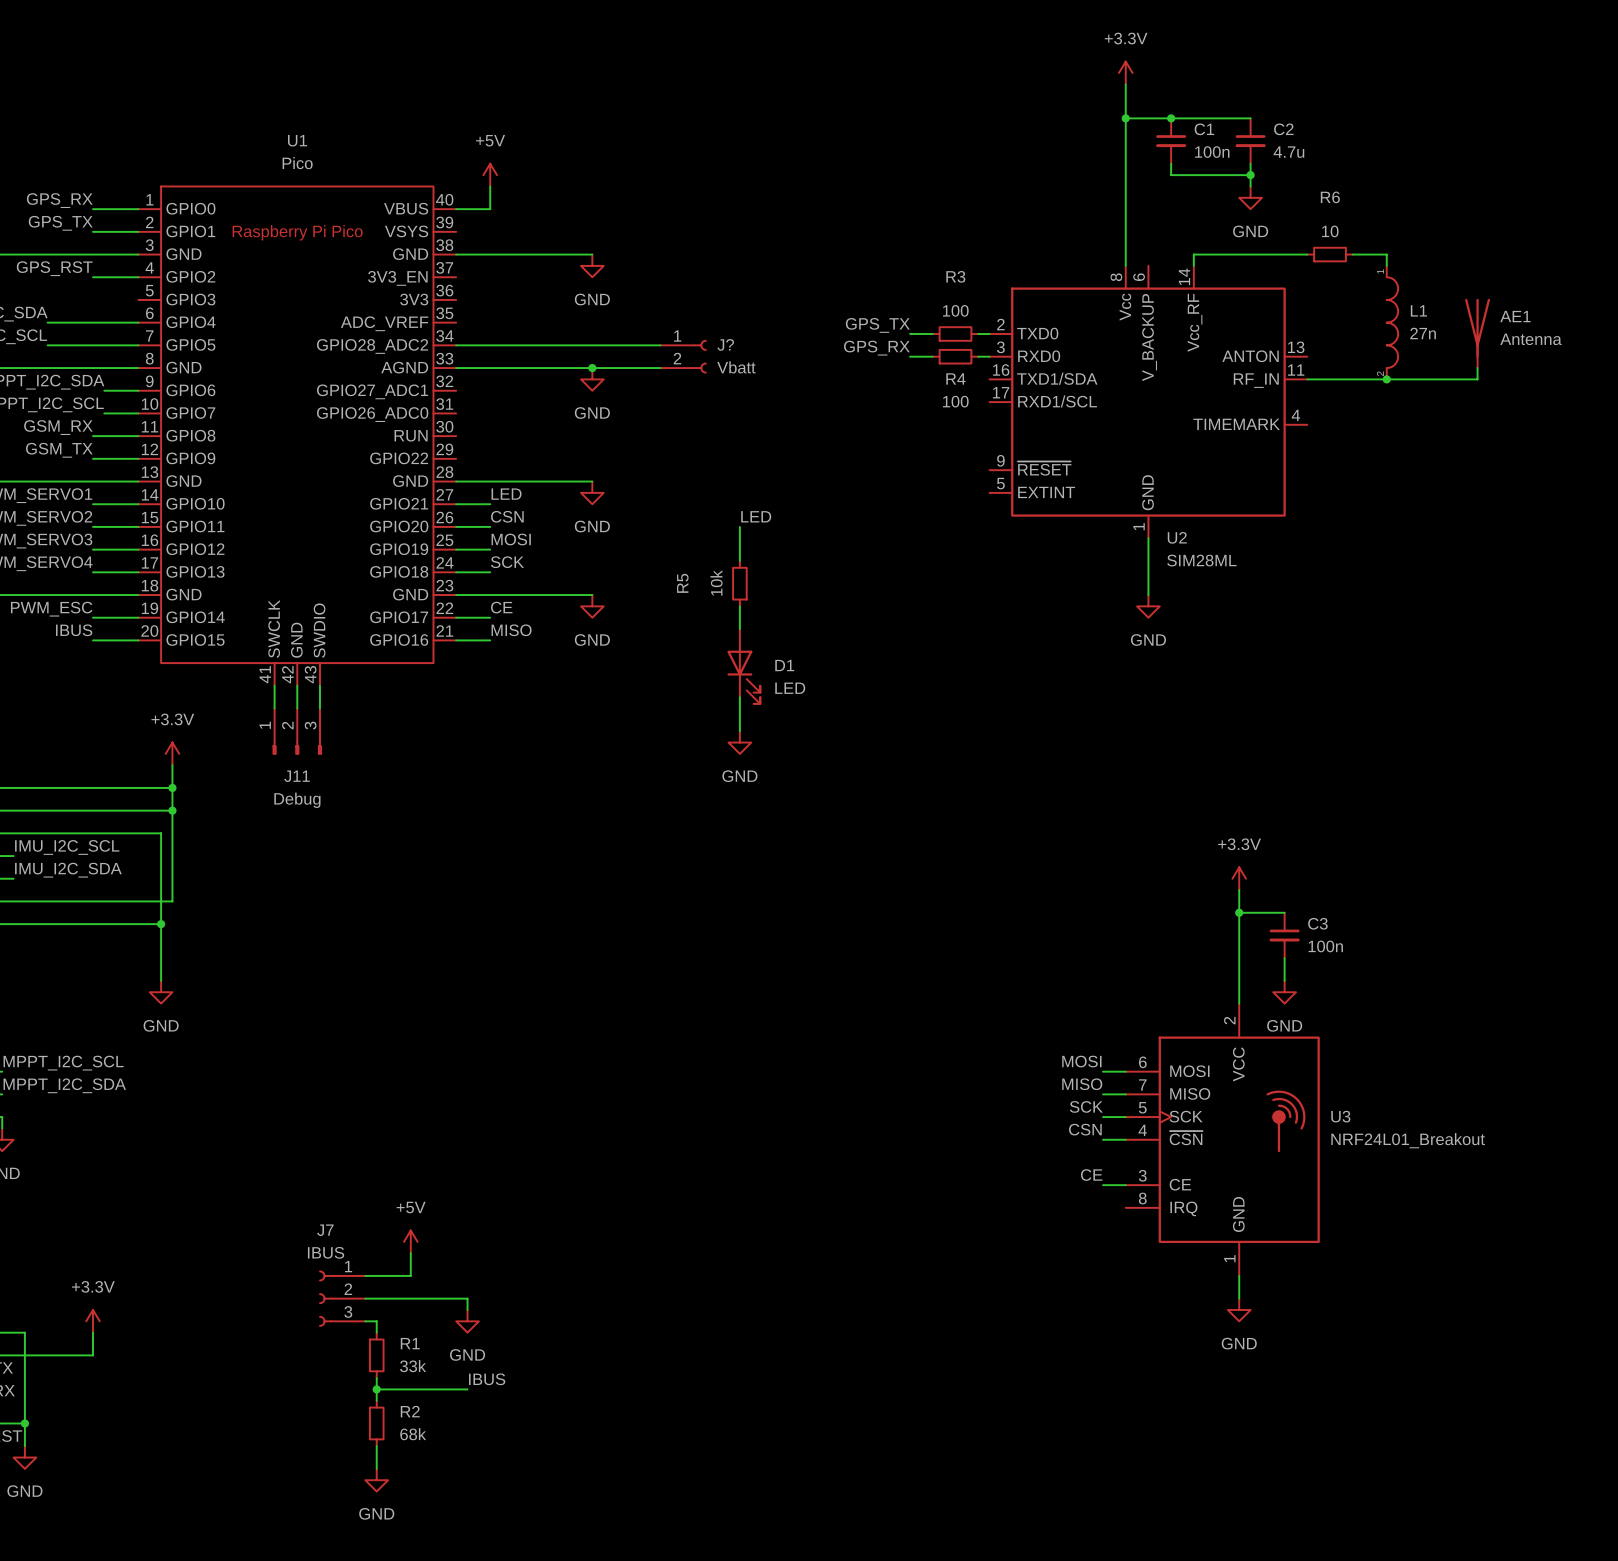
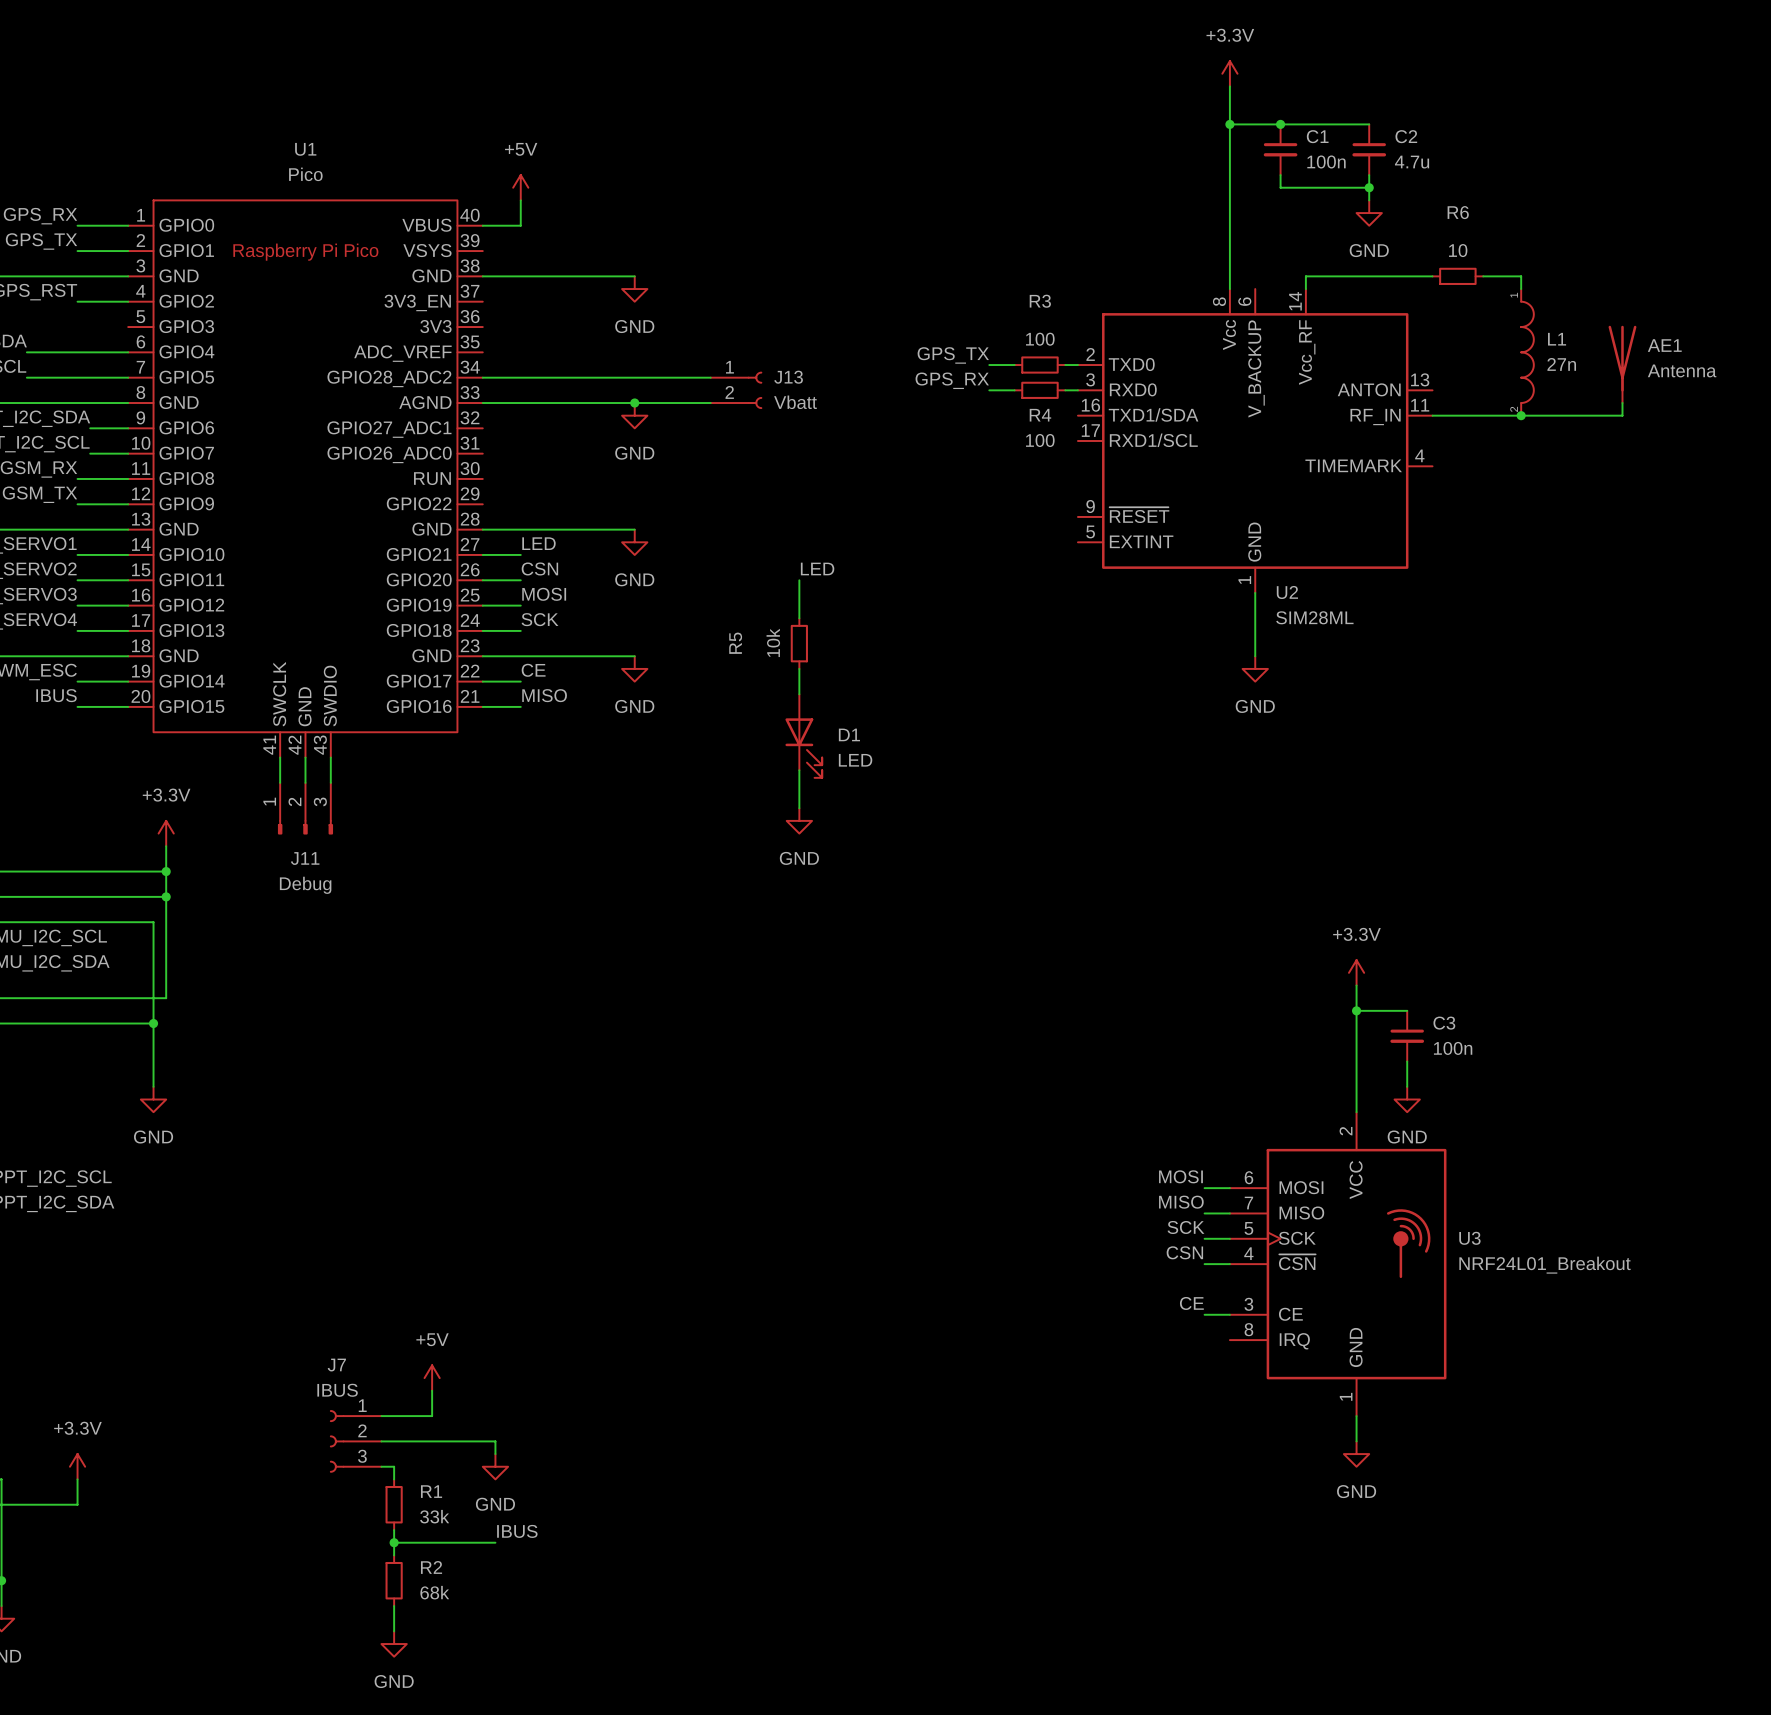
J? name: J? (725, 344) -> J13 (788, 377)

